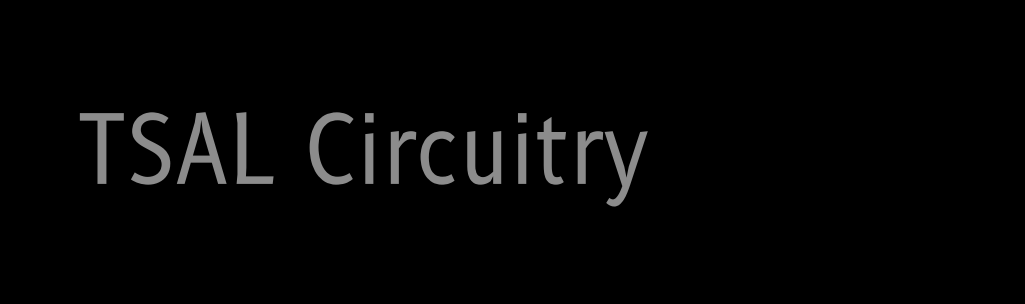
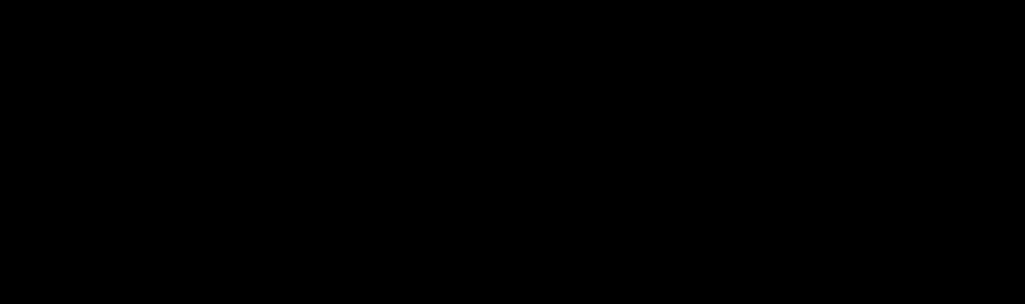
text: TSAL Circuitry (363, 159) -> none

